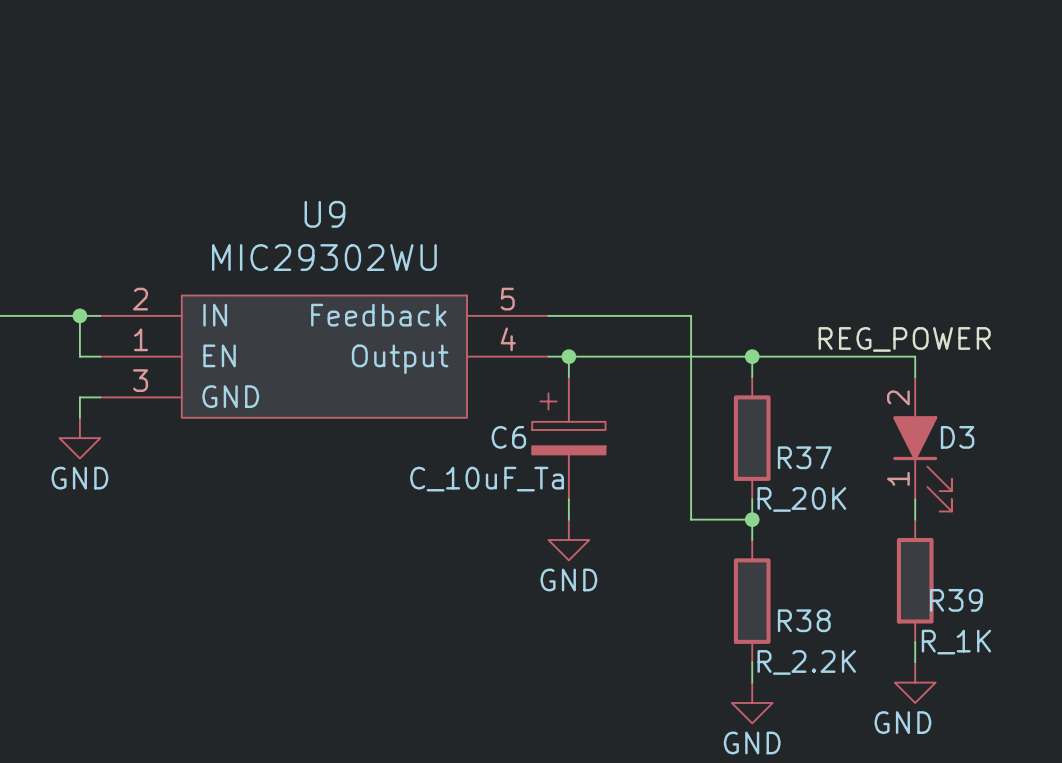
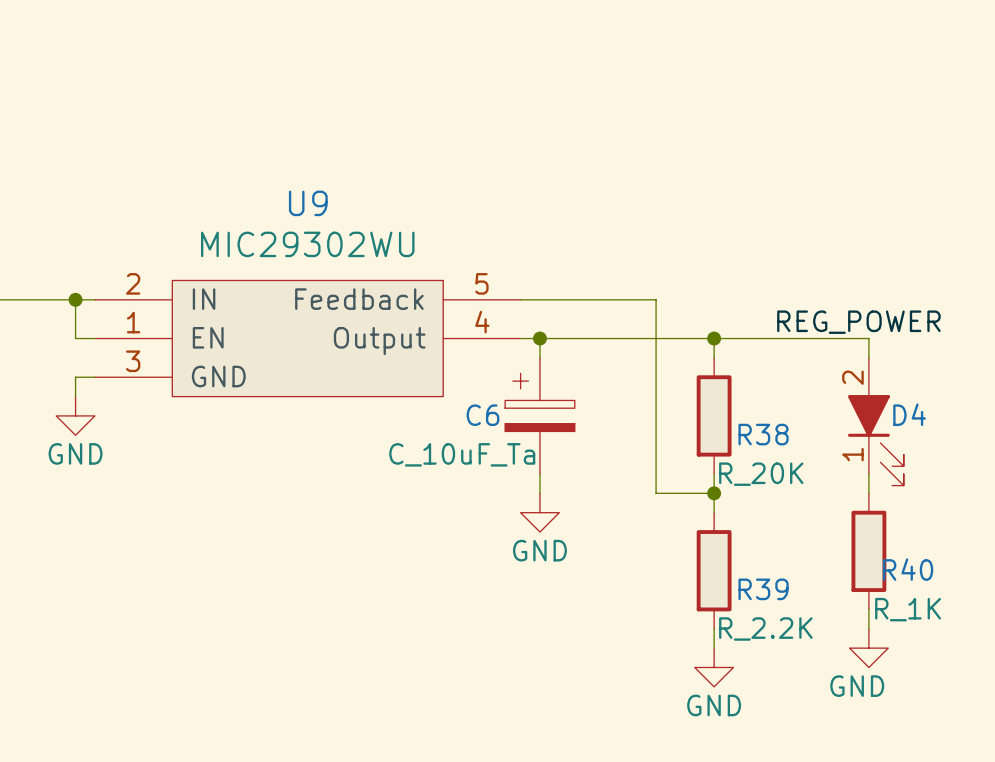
D3 name: D3 (957, 437) -> D4 (909, 414)
R37 name: R37 (804, 457) -> R38 (763, 434)
R39 name: R39 (956, 600) -> R40 (908, 569)
R38 name: R38 (804, 620) -> R39 (763, 589)

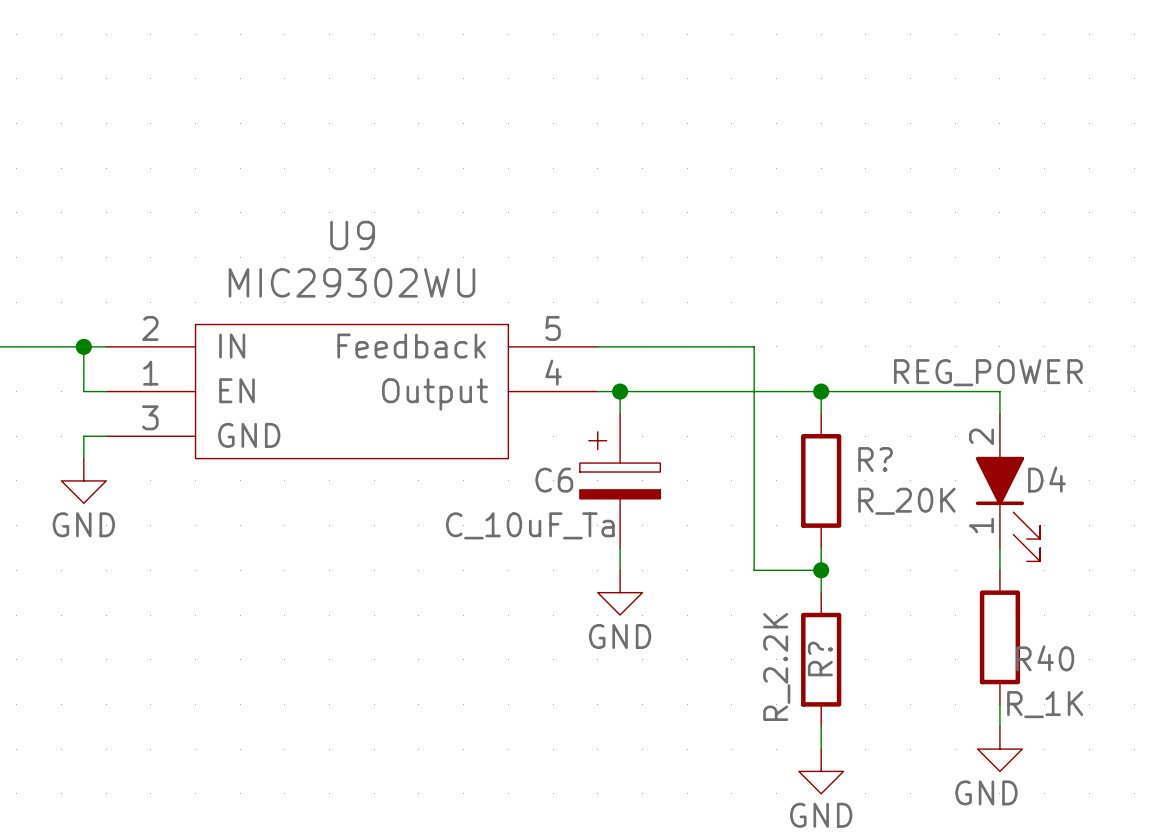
R38 name: R38 (763, 434) -> R? (875, 459)
R38 value position: R_20K (761, 474) -> R_20K (906, 501)
R39 name: R39 (763, 589) -> R? (820, 659)
R39 value rotation: 0° (765, 628) -> 90° counterclockwise (776, 666)

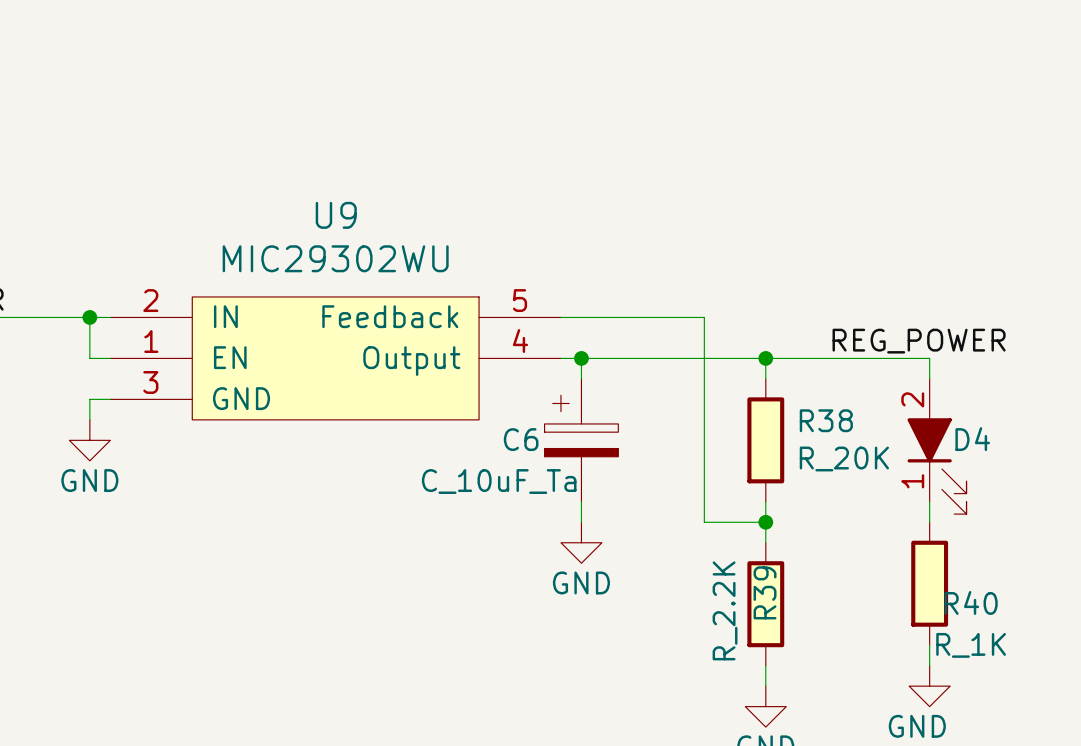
R? name: R? (875, 459) -> R38 (826, 420)
R? name: R? (820, 659) -> R39 (765, 592)

